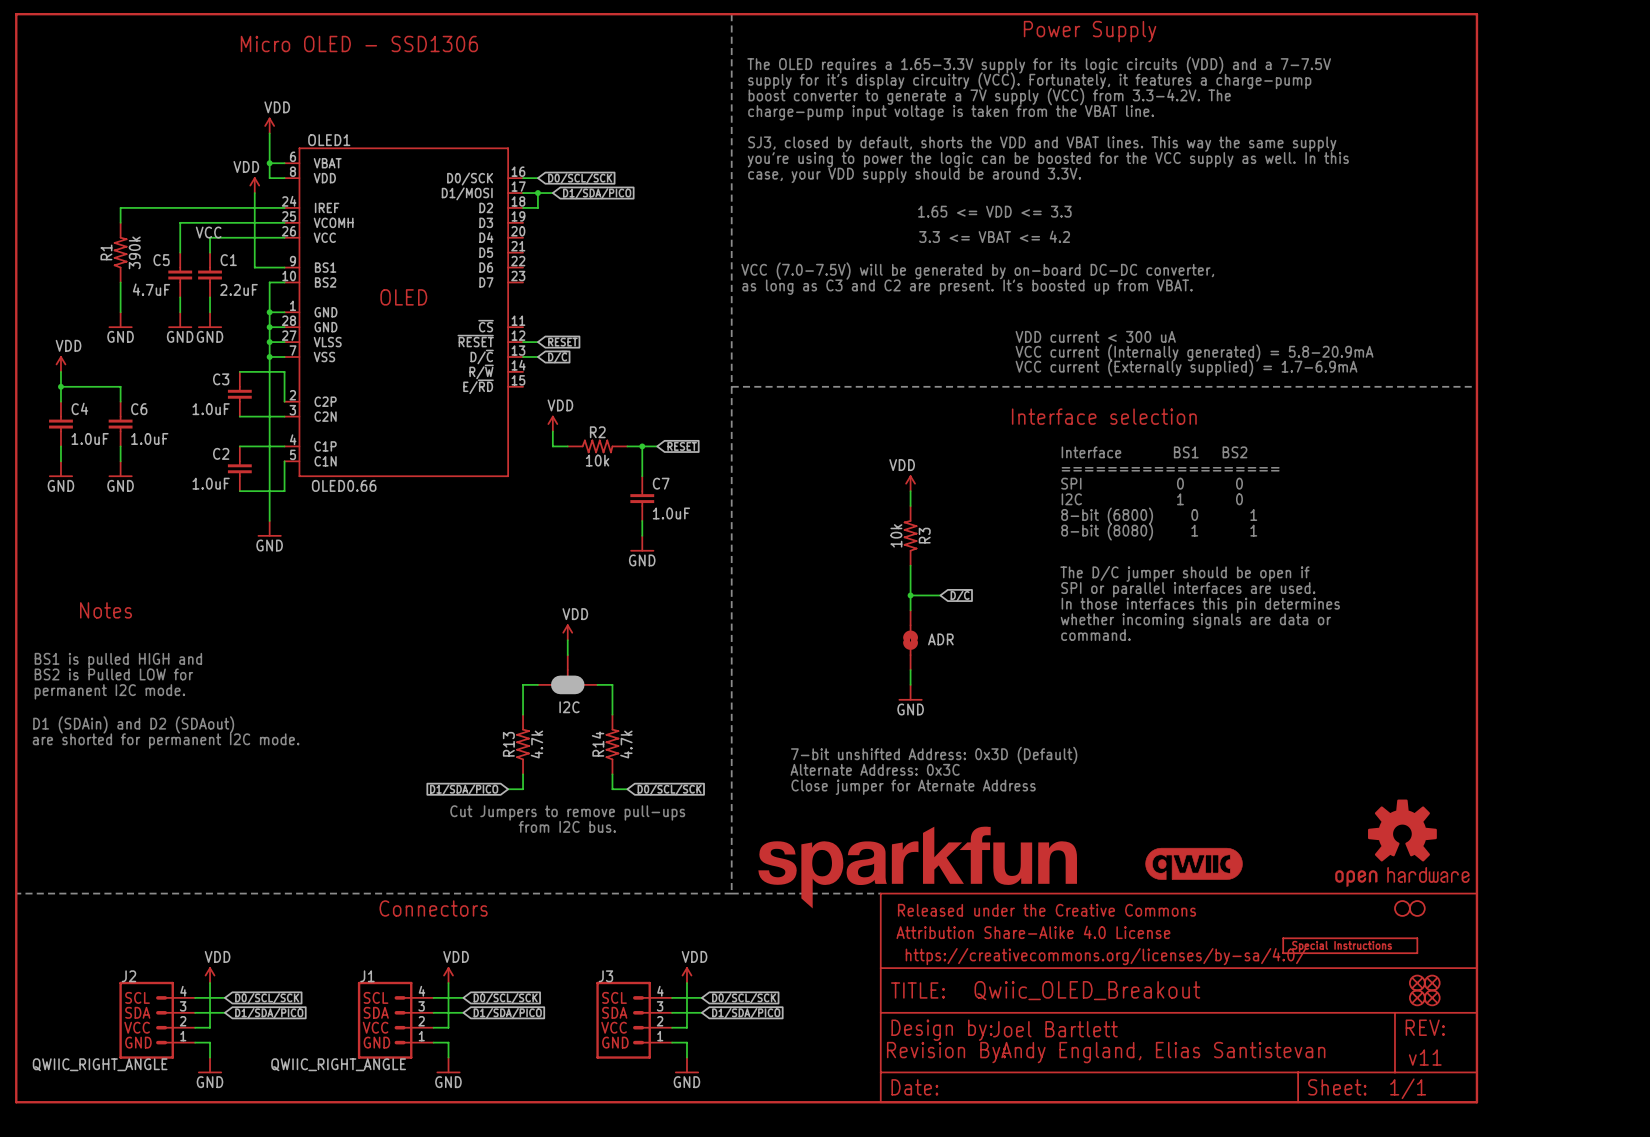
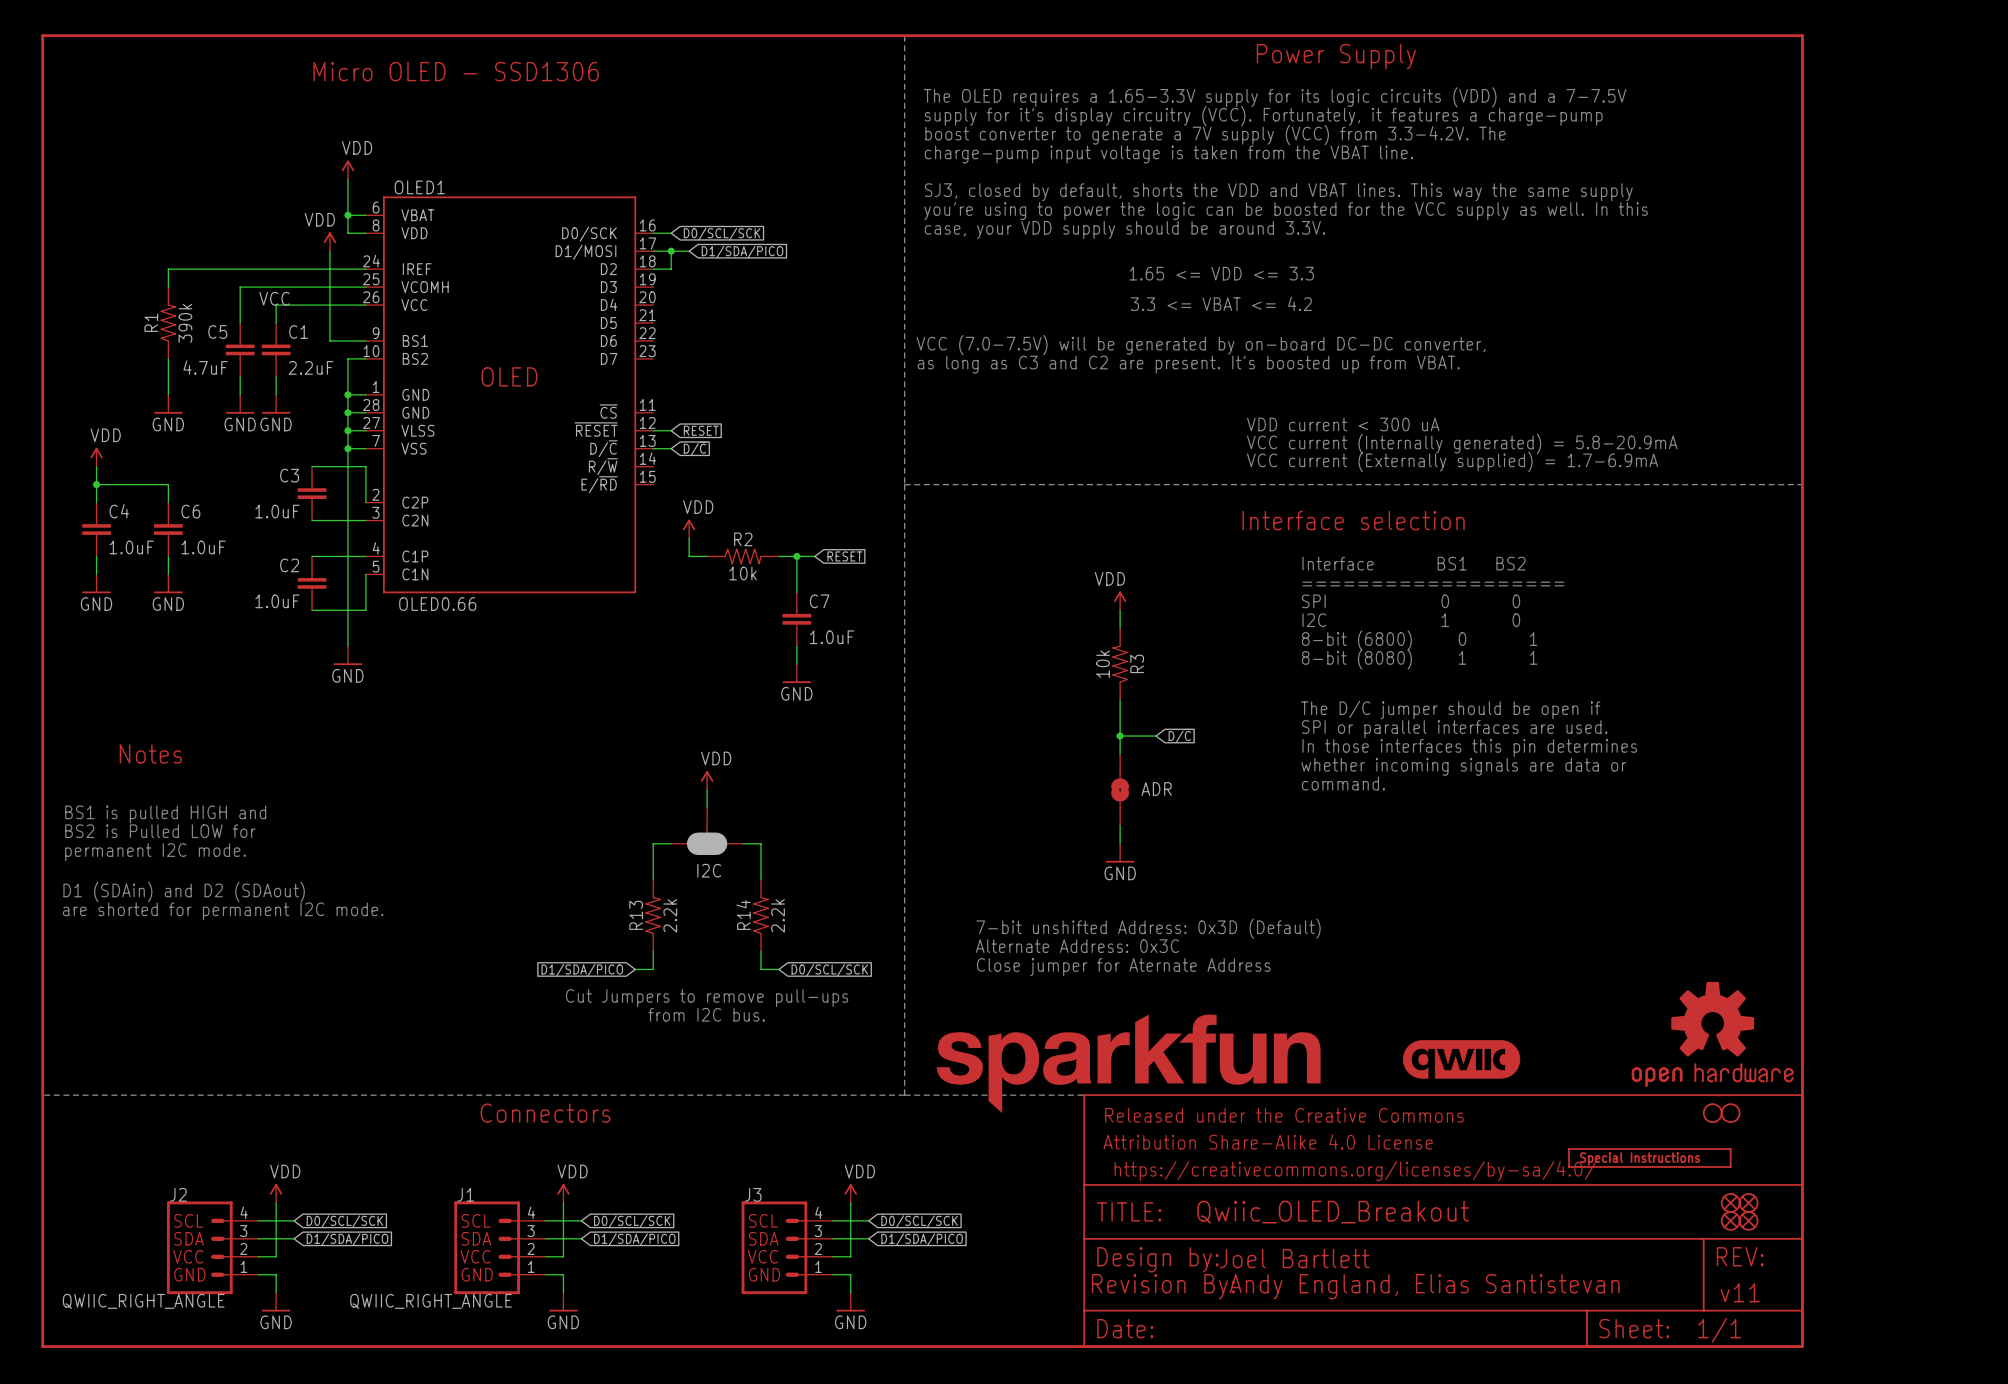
R13 value: 4.7k (536, 744) -> 2.2k (670, 915)
R14 value: 4.7k (626, 744) -> 2.2k (778, 915)

